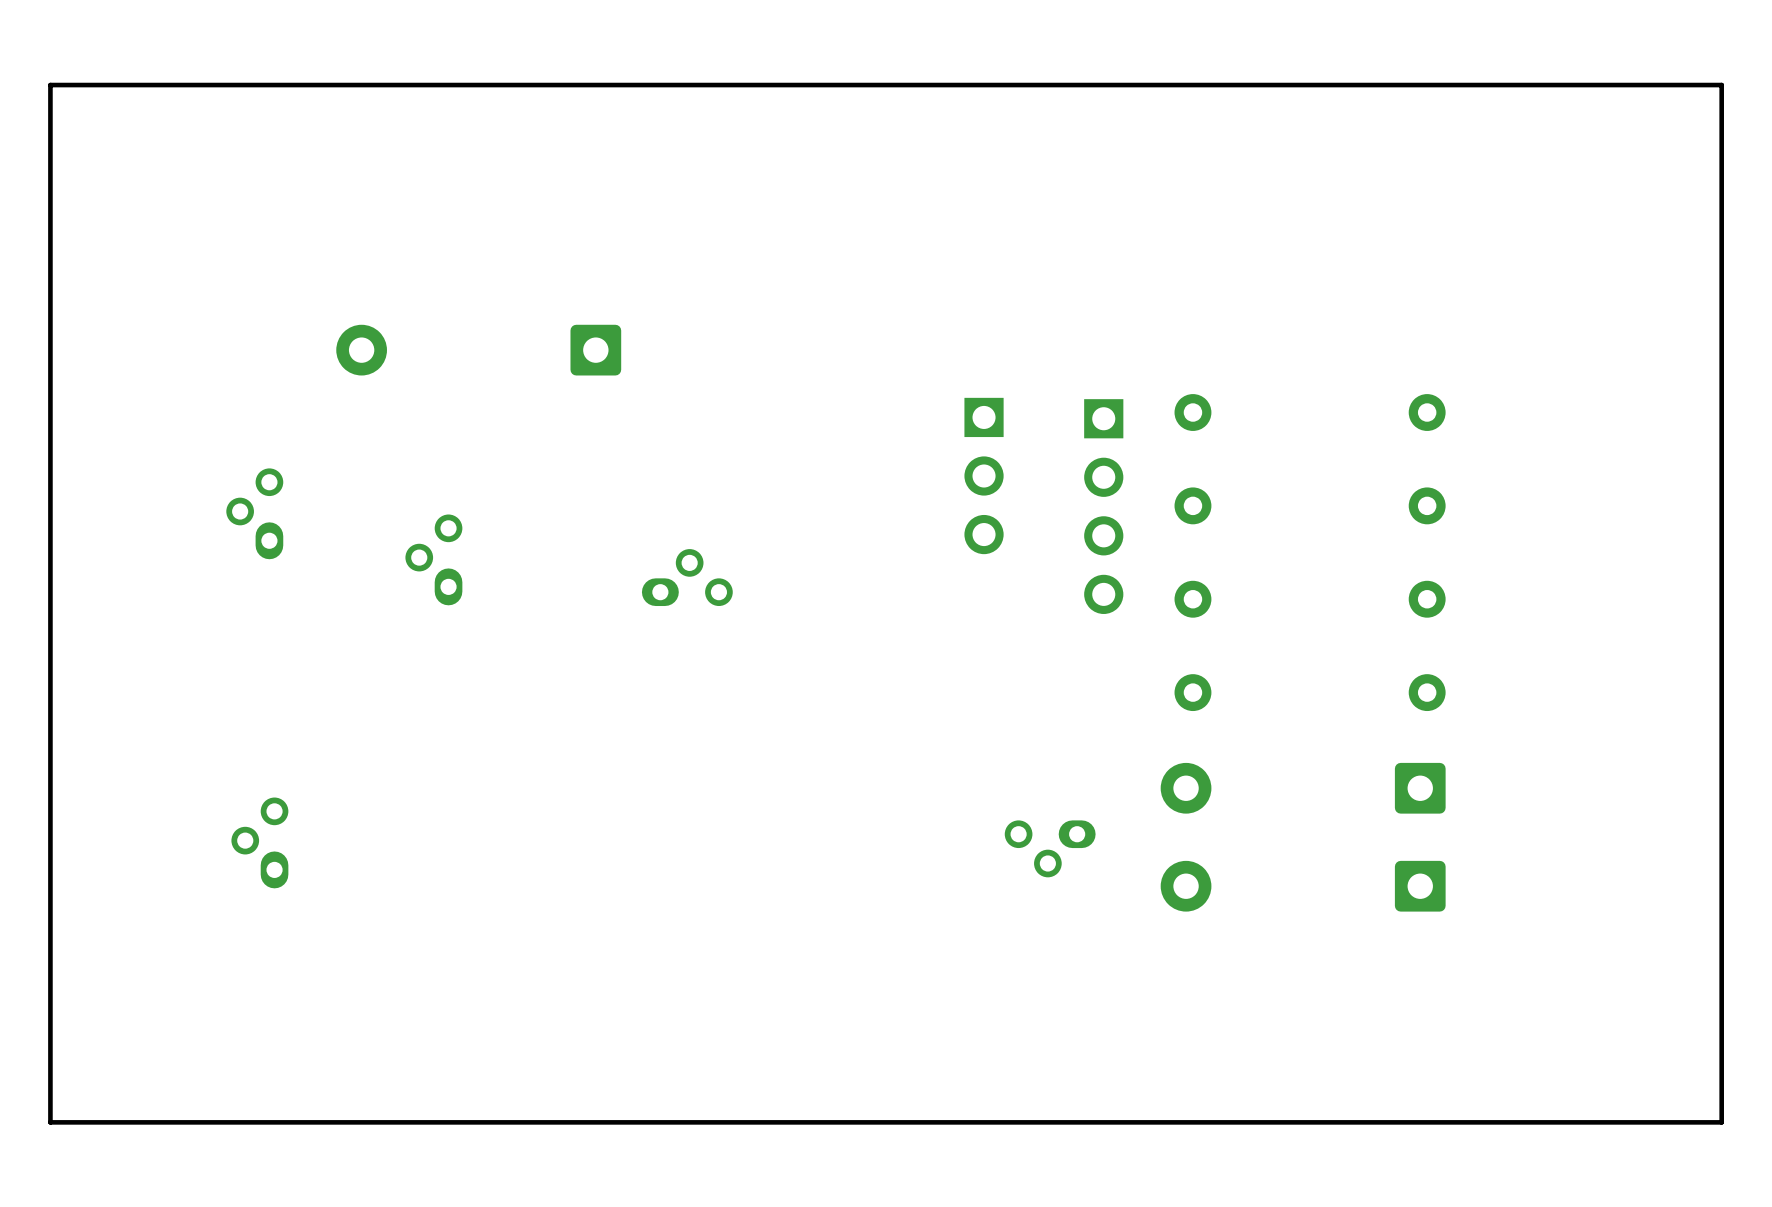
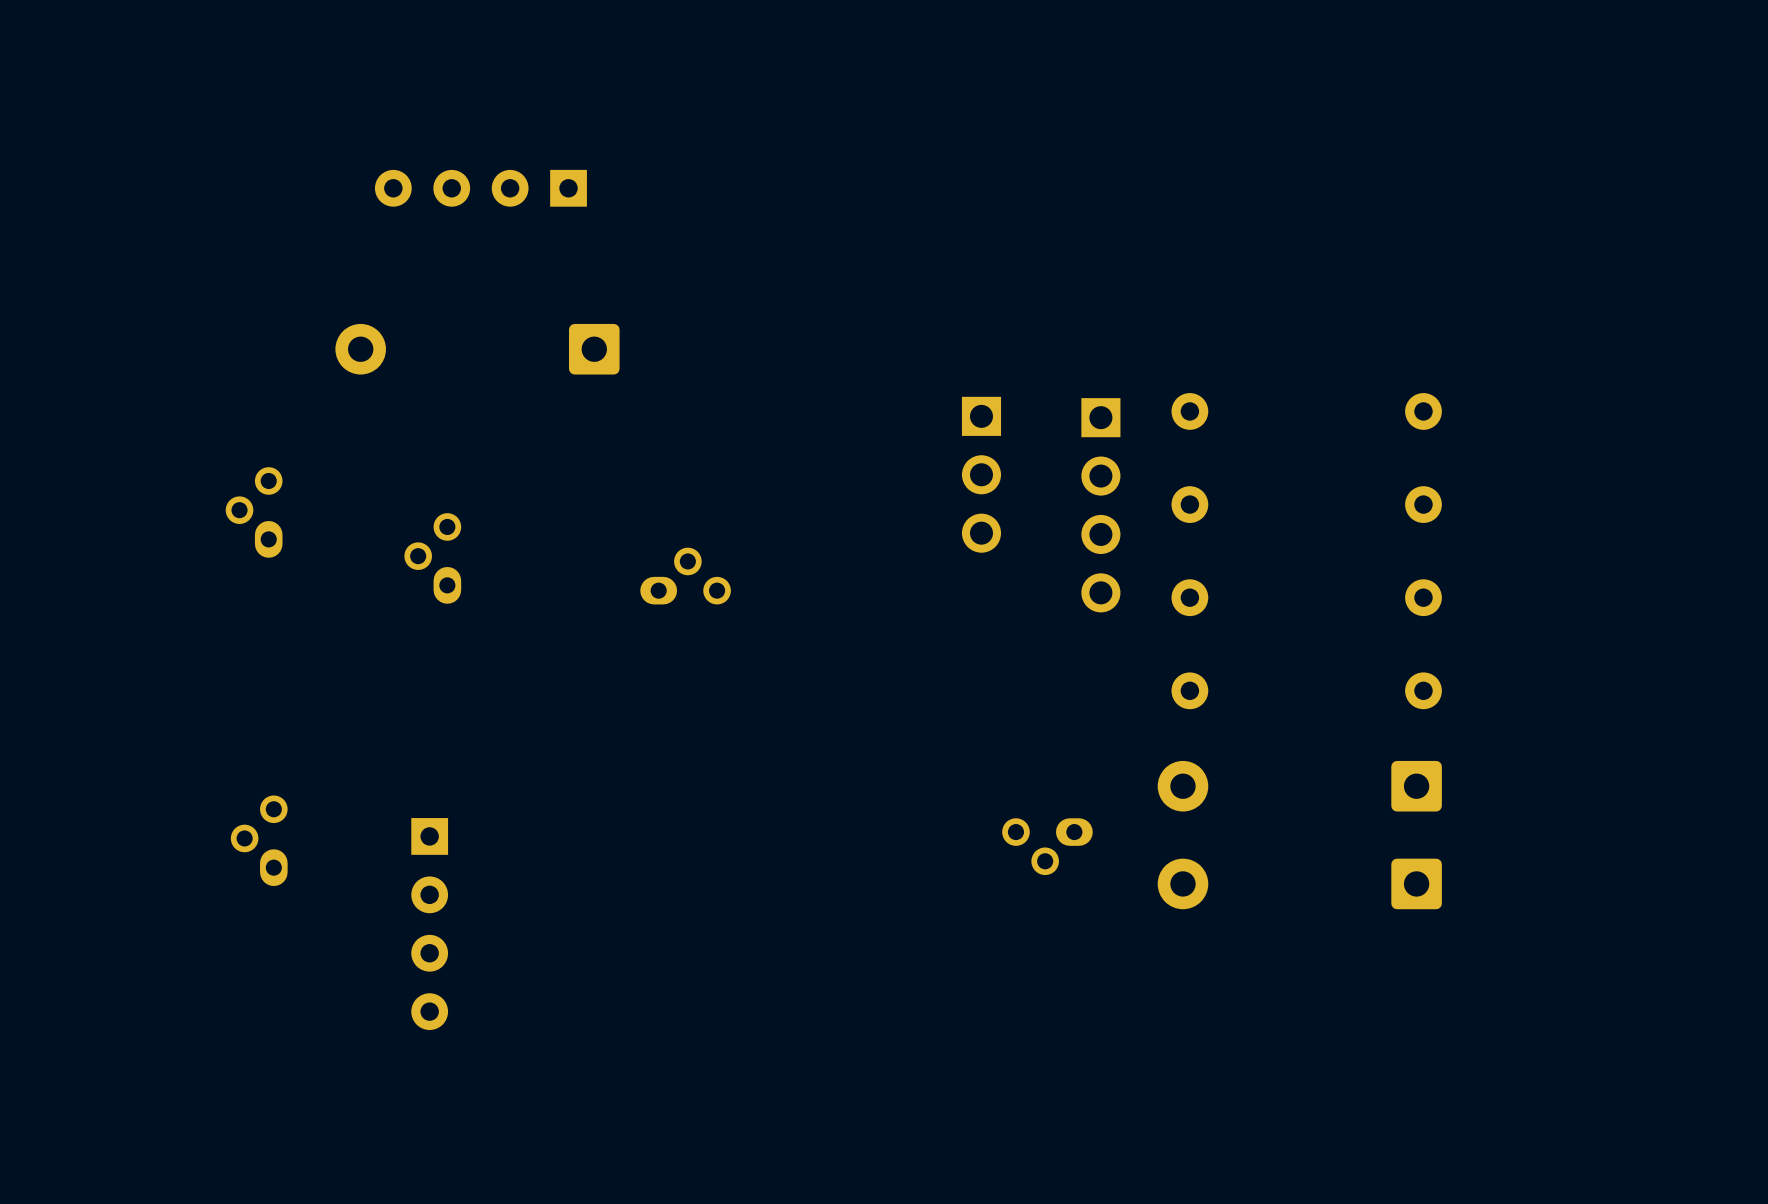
board edge: (1721, 85) (1721, 1122) (50, 1122) (50, 85) (1721, 85) -> none
part: none -> (480, 188)
part: none -> (429, 924)

